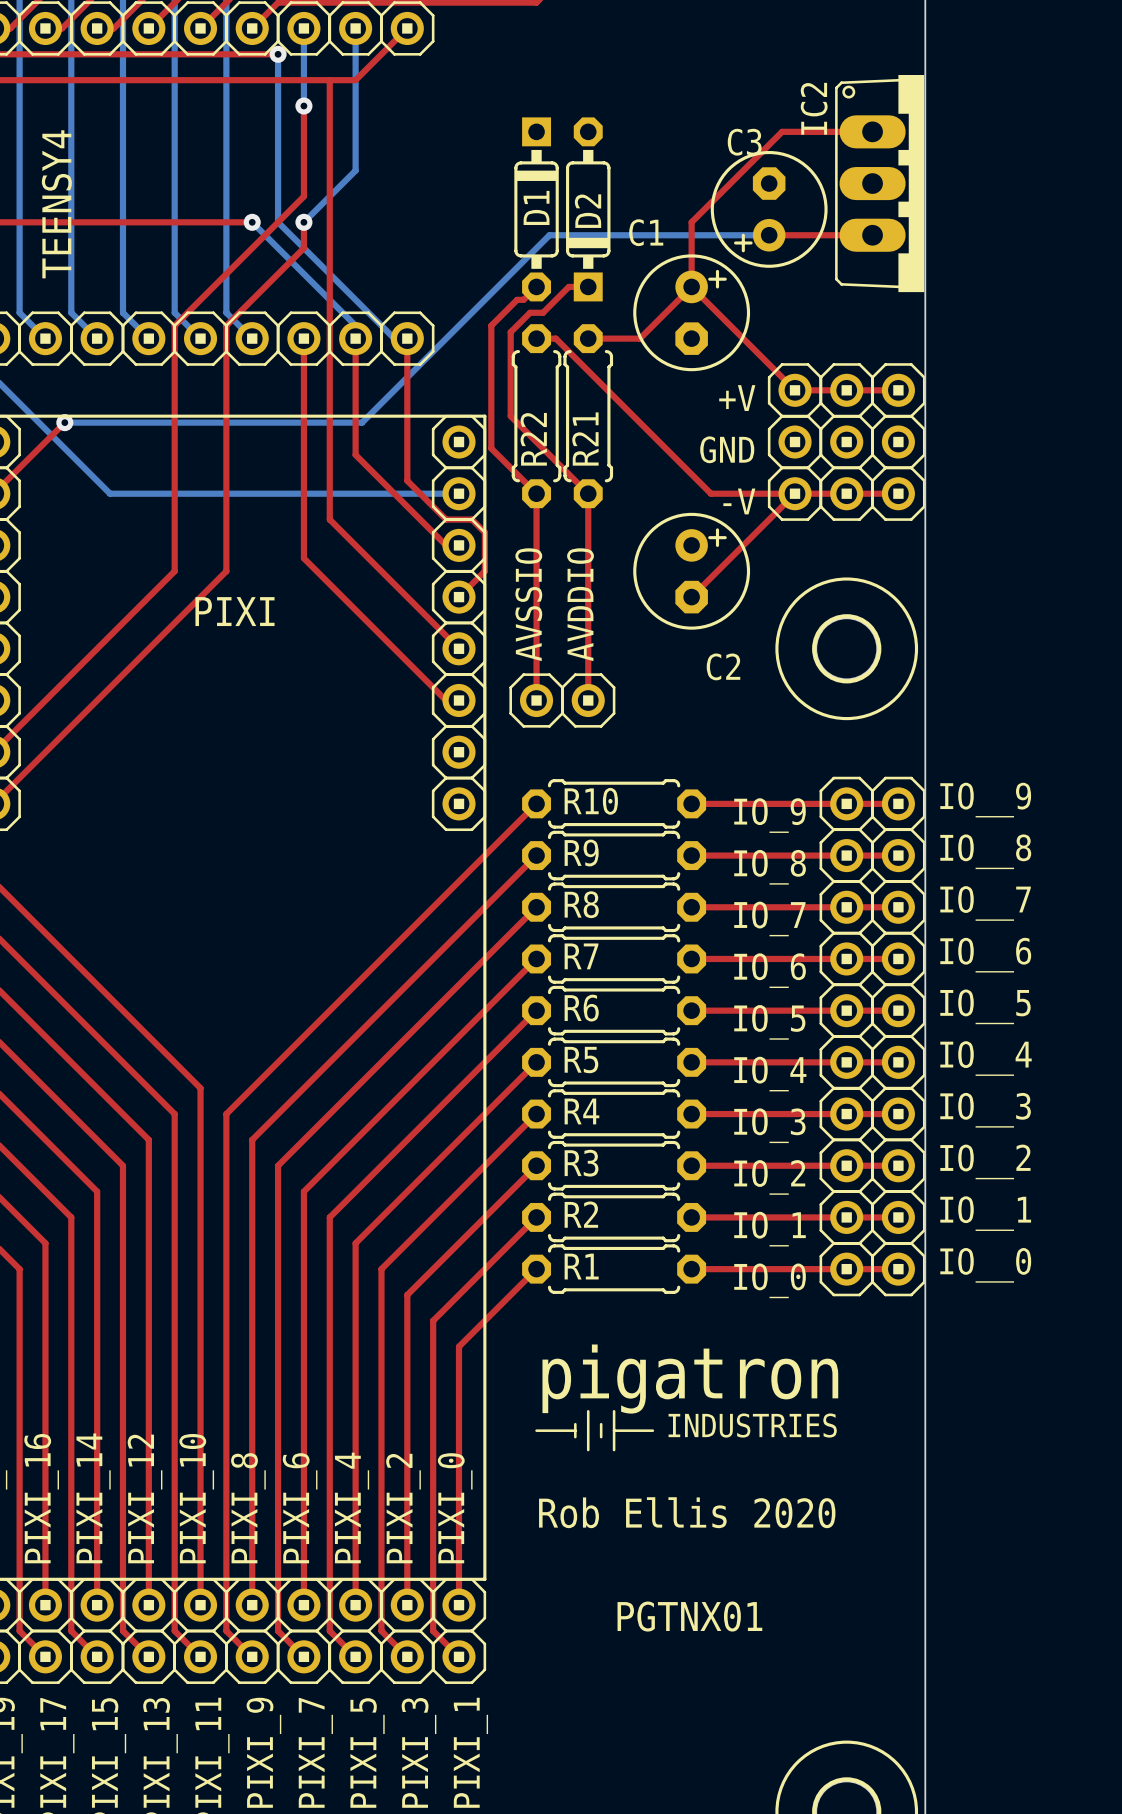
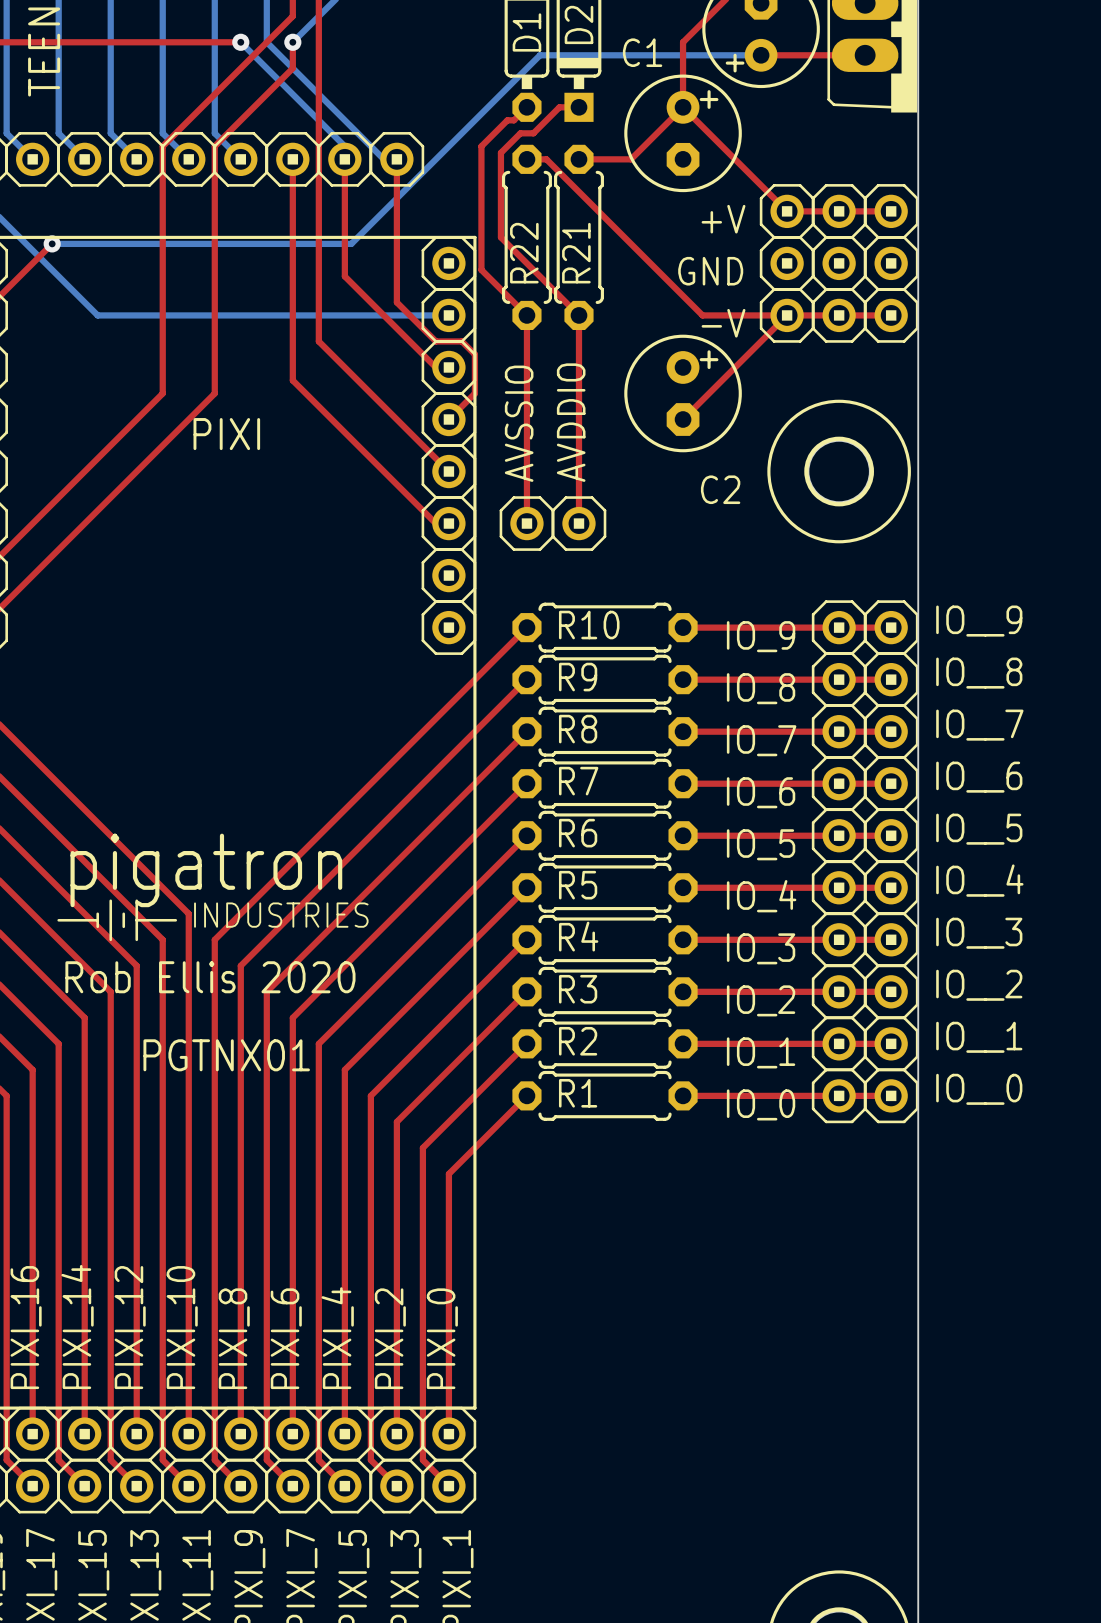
drawing: none -> [57, 899, 178, 942]
text: none -> Rob Ellis 2020 (210, 977)
text: none -> PGTNX01 (226, 1055)
drawing: [535, 1410, 655, 1452] -> none
text: Rob Ellis 2020 (687, 1512) -> none
text: PGTNX01 (689, 1616) -> none

